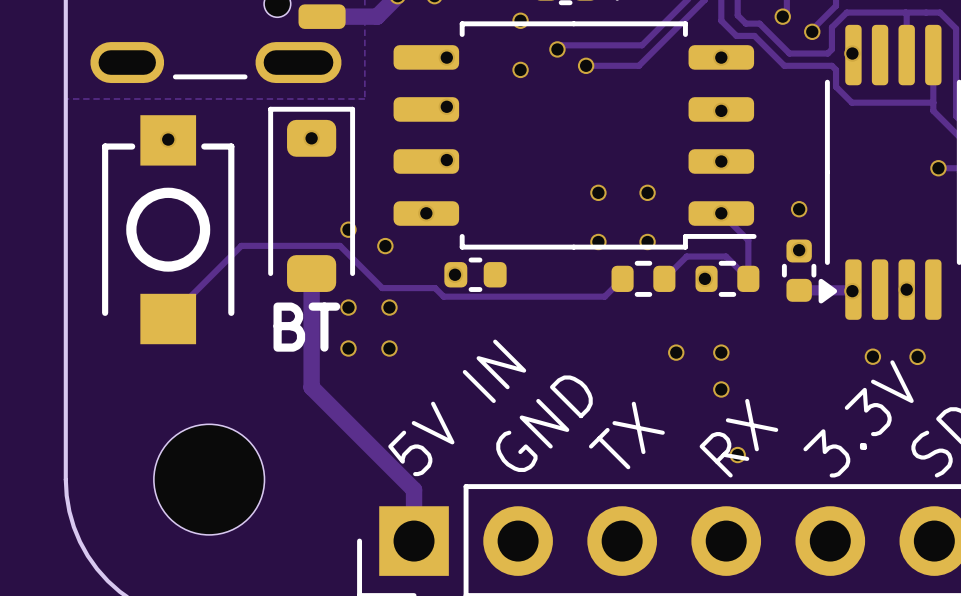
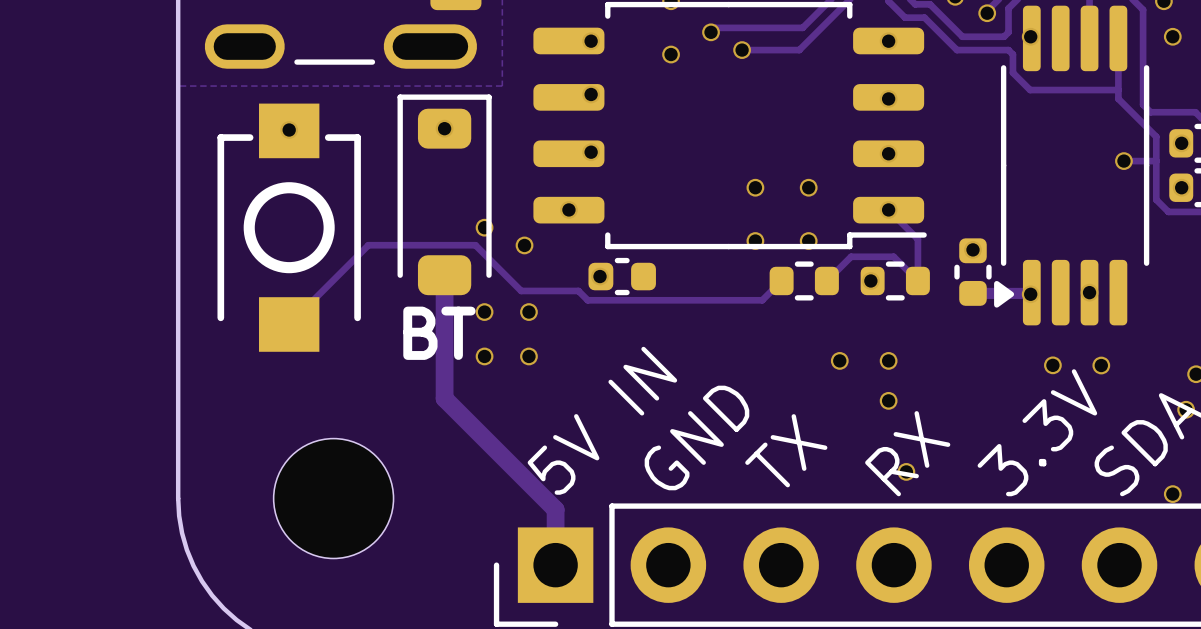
via: (799, 209) -> none

